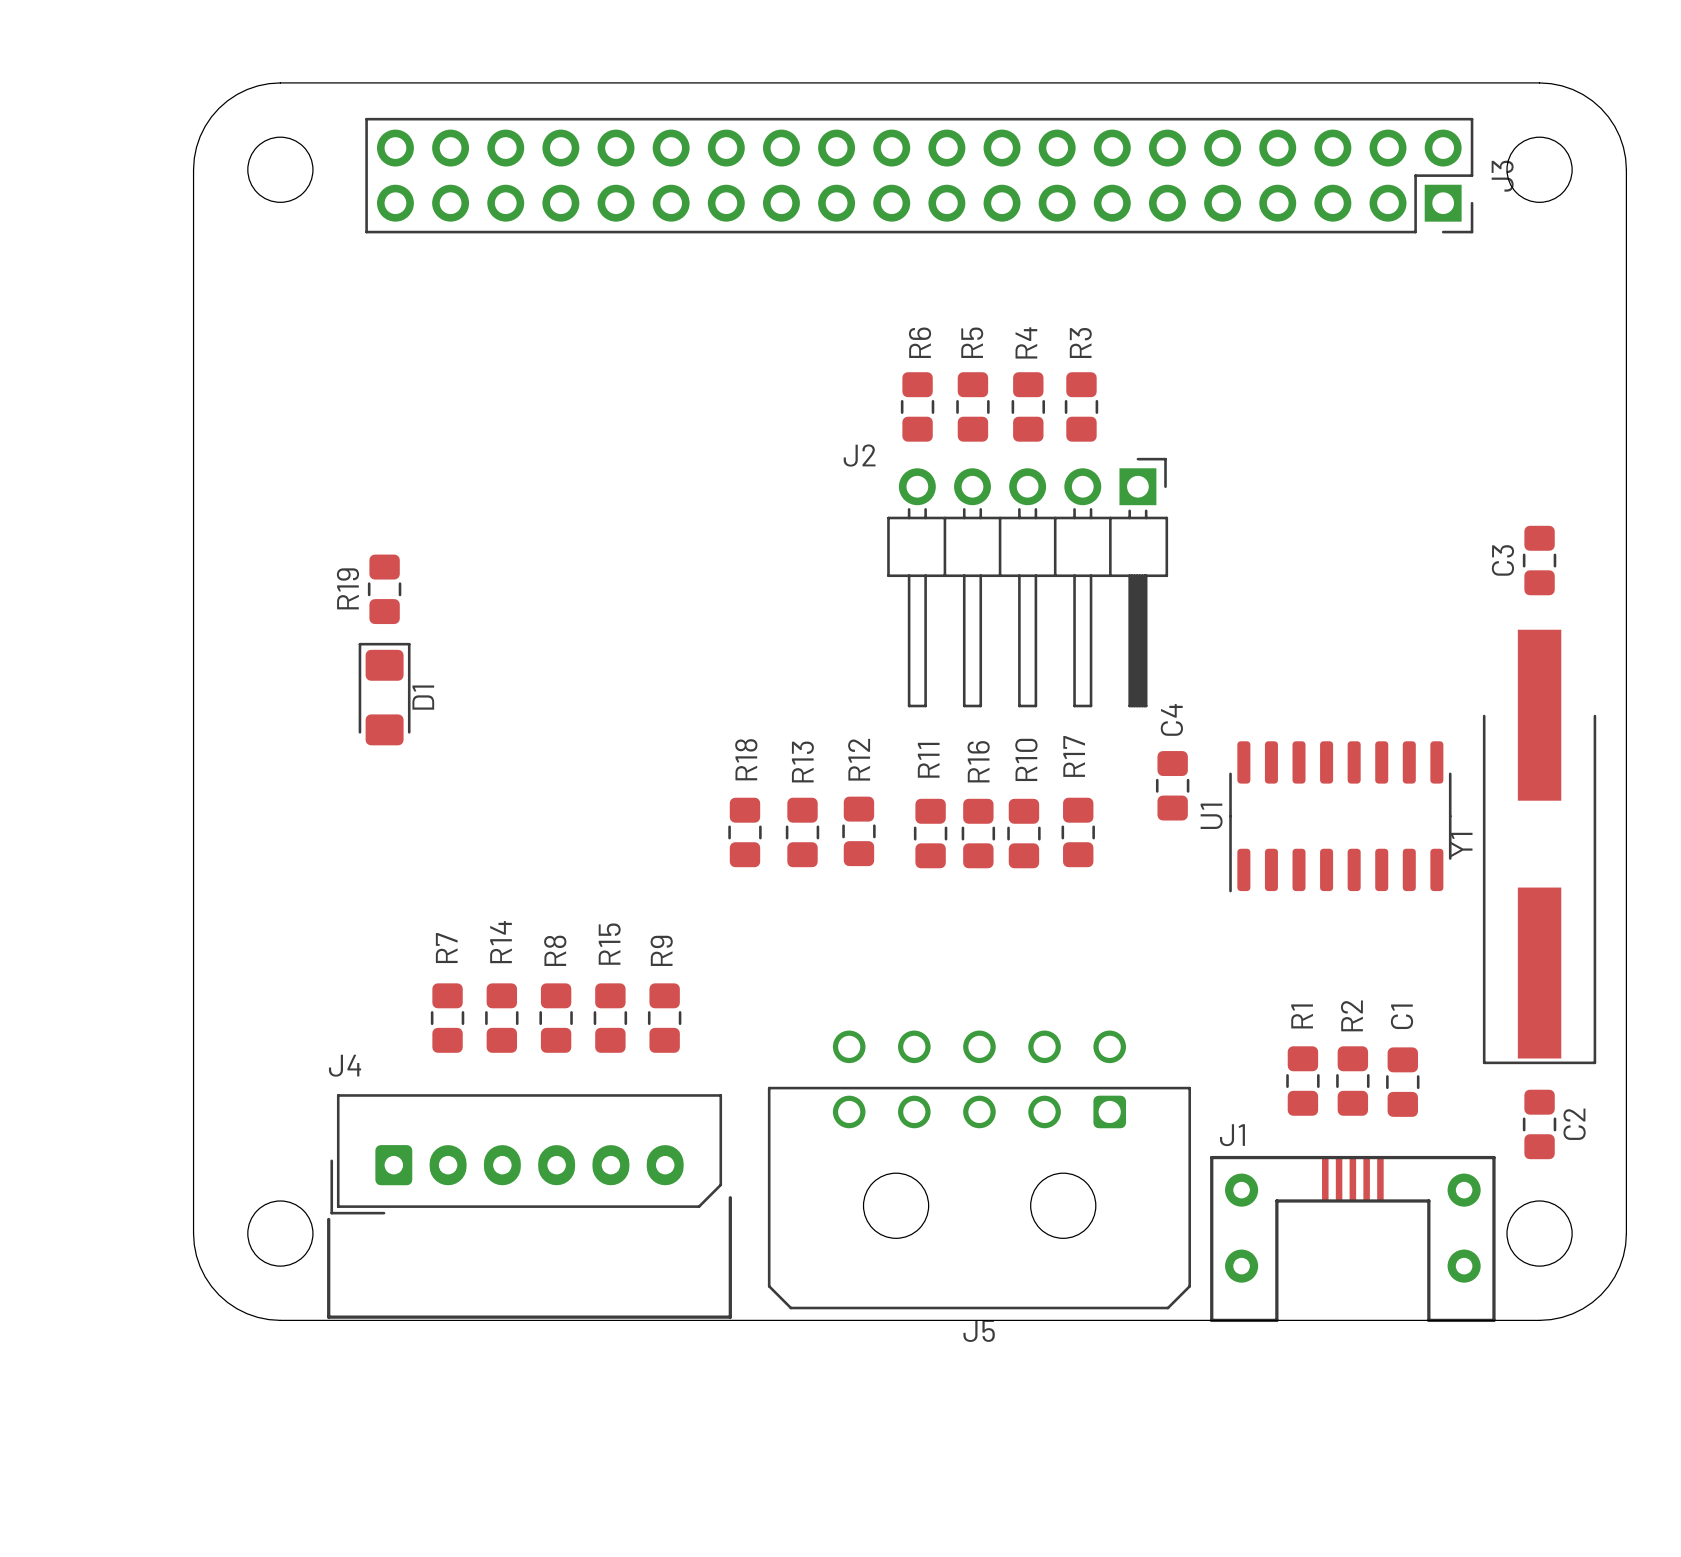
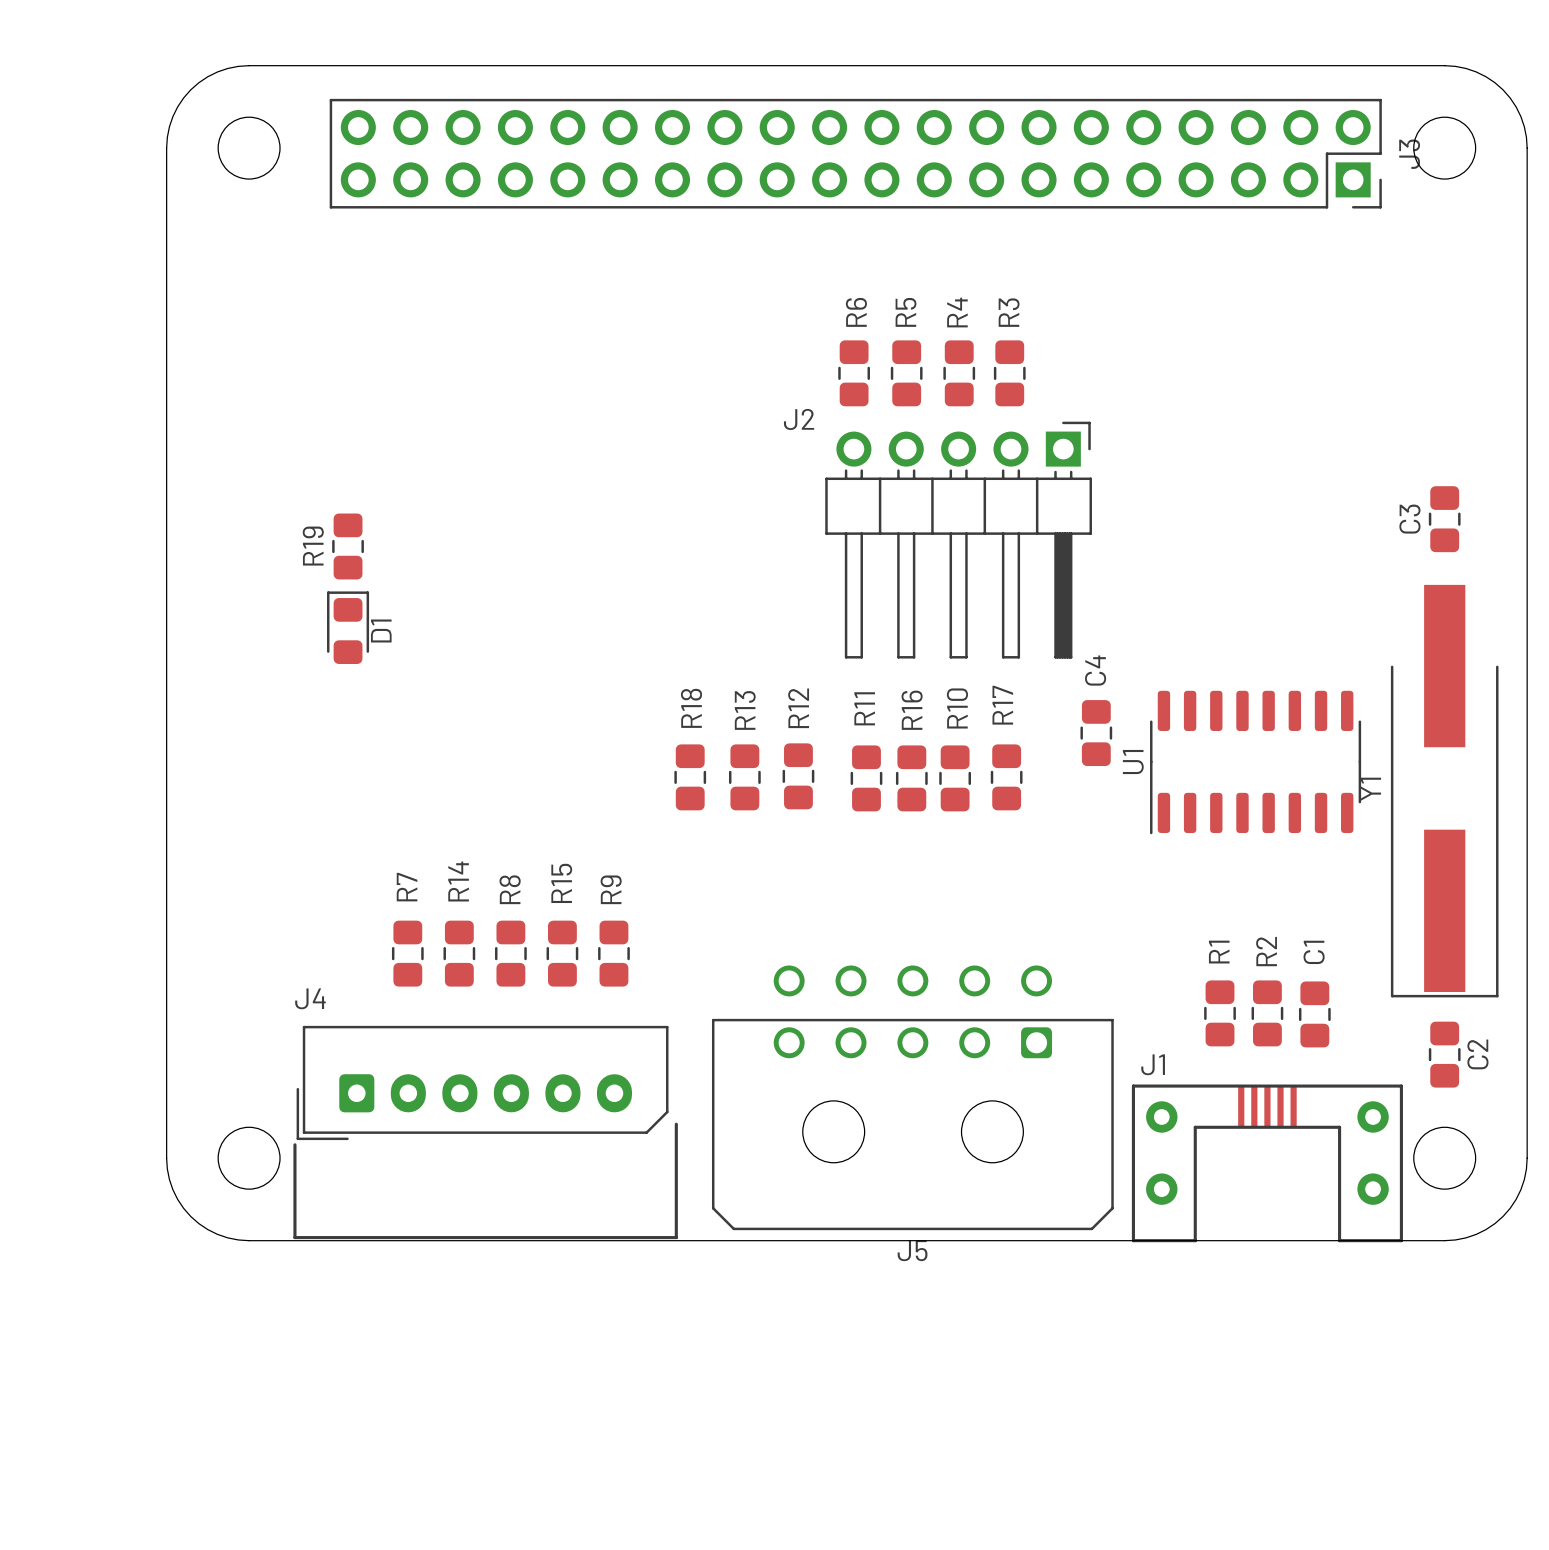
D1 footprint: [358, 642, 411, 746] -> [327, 591, 370, 664]

